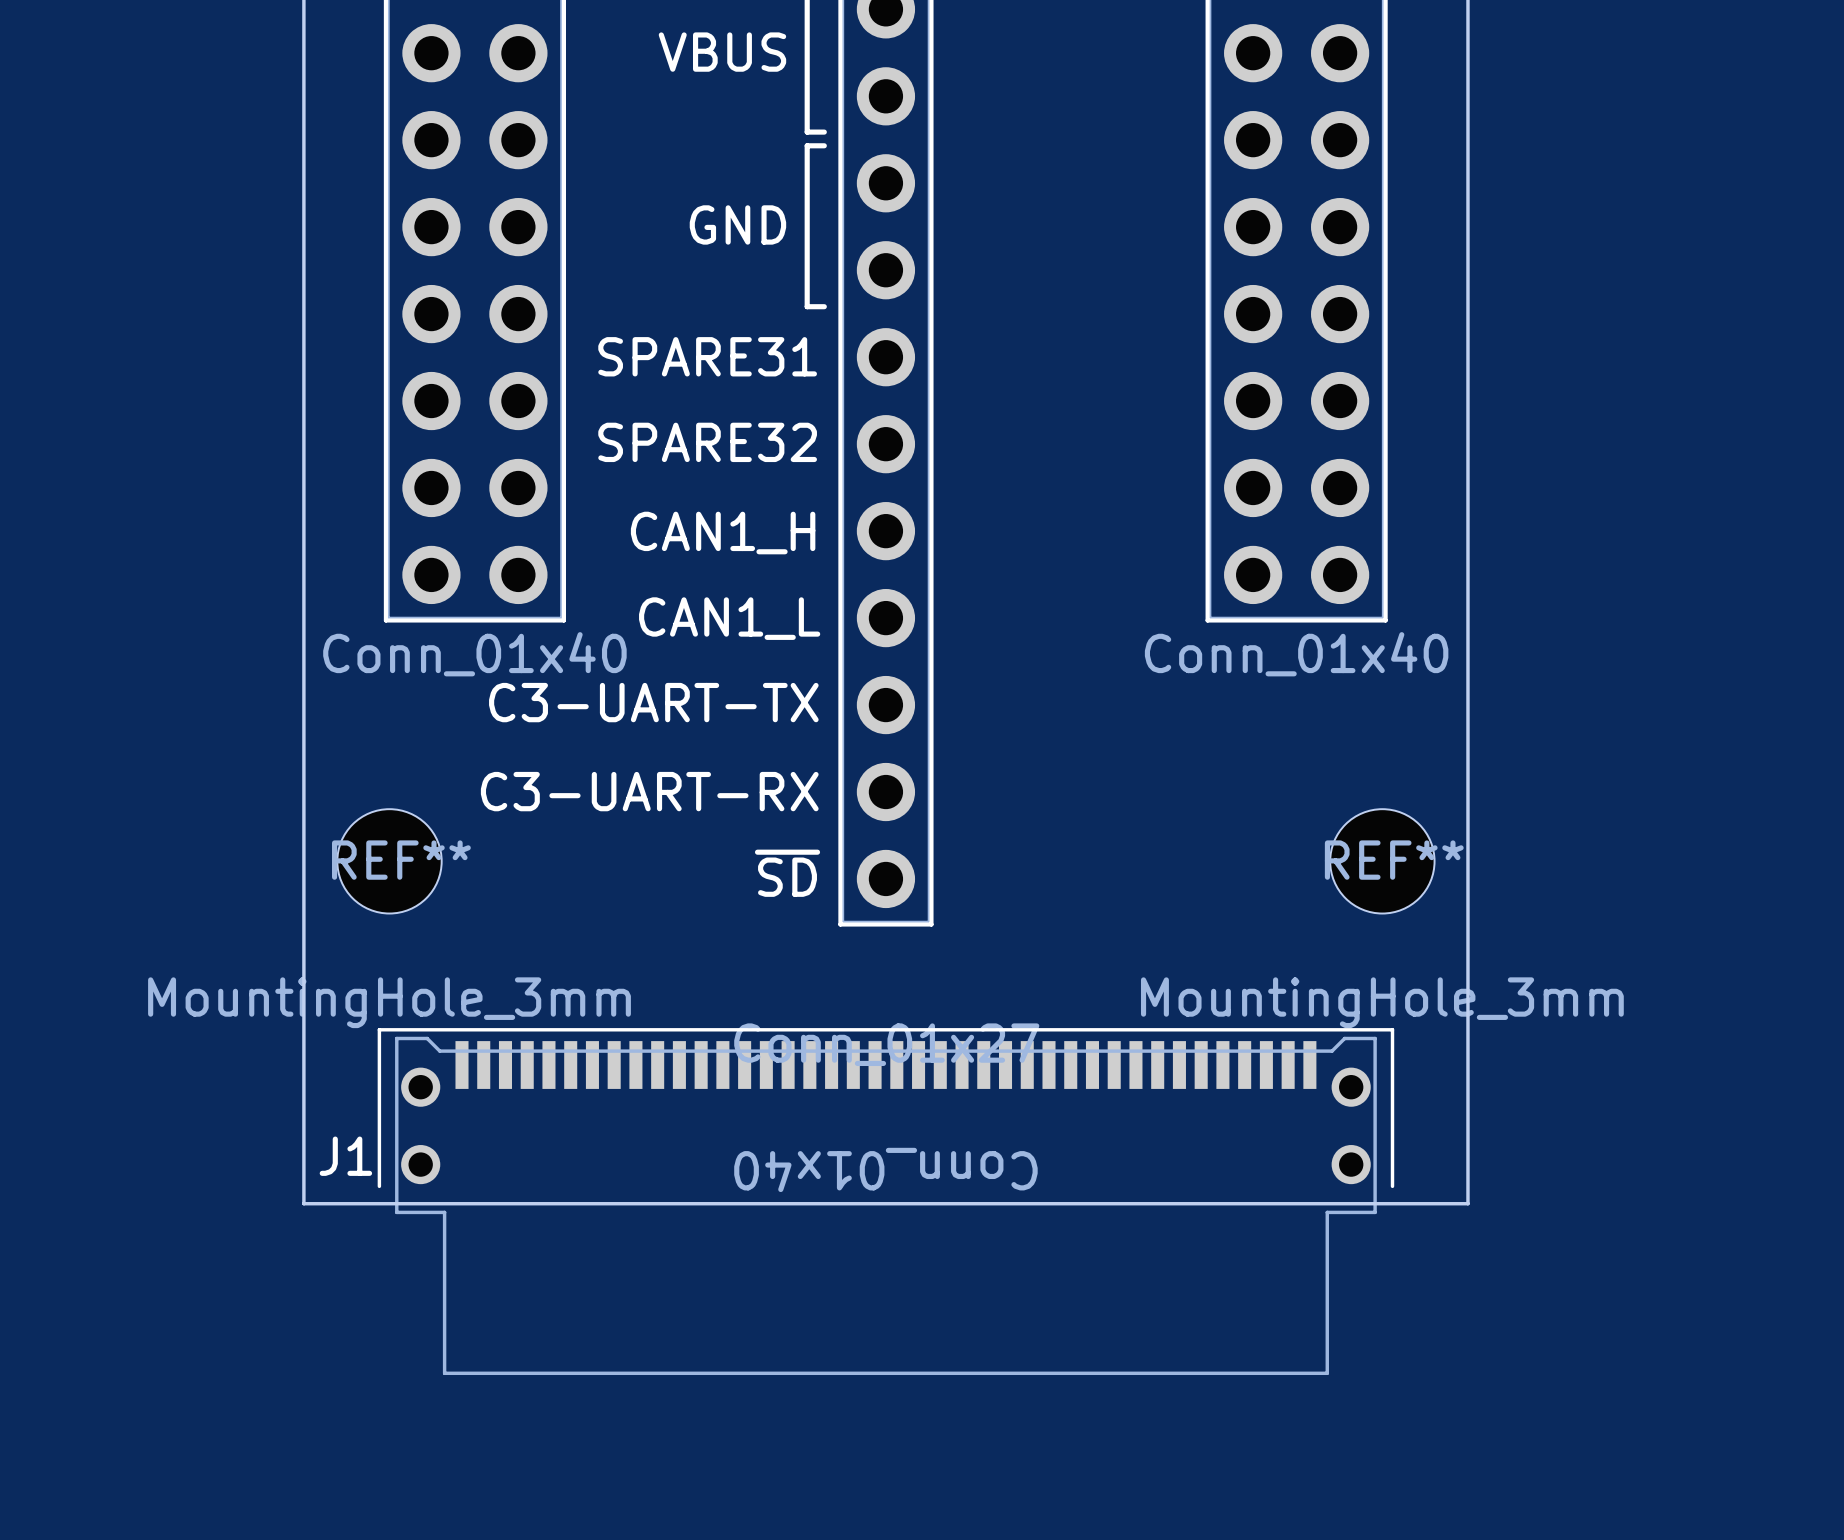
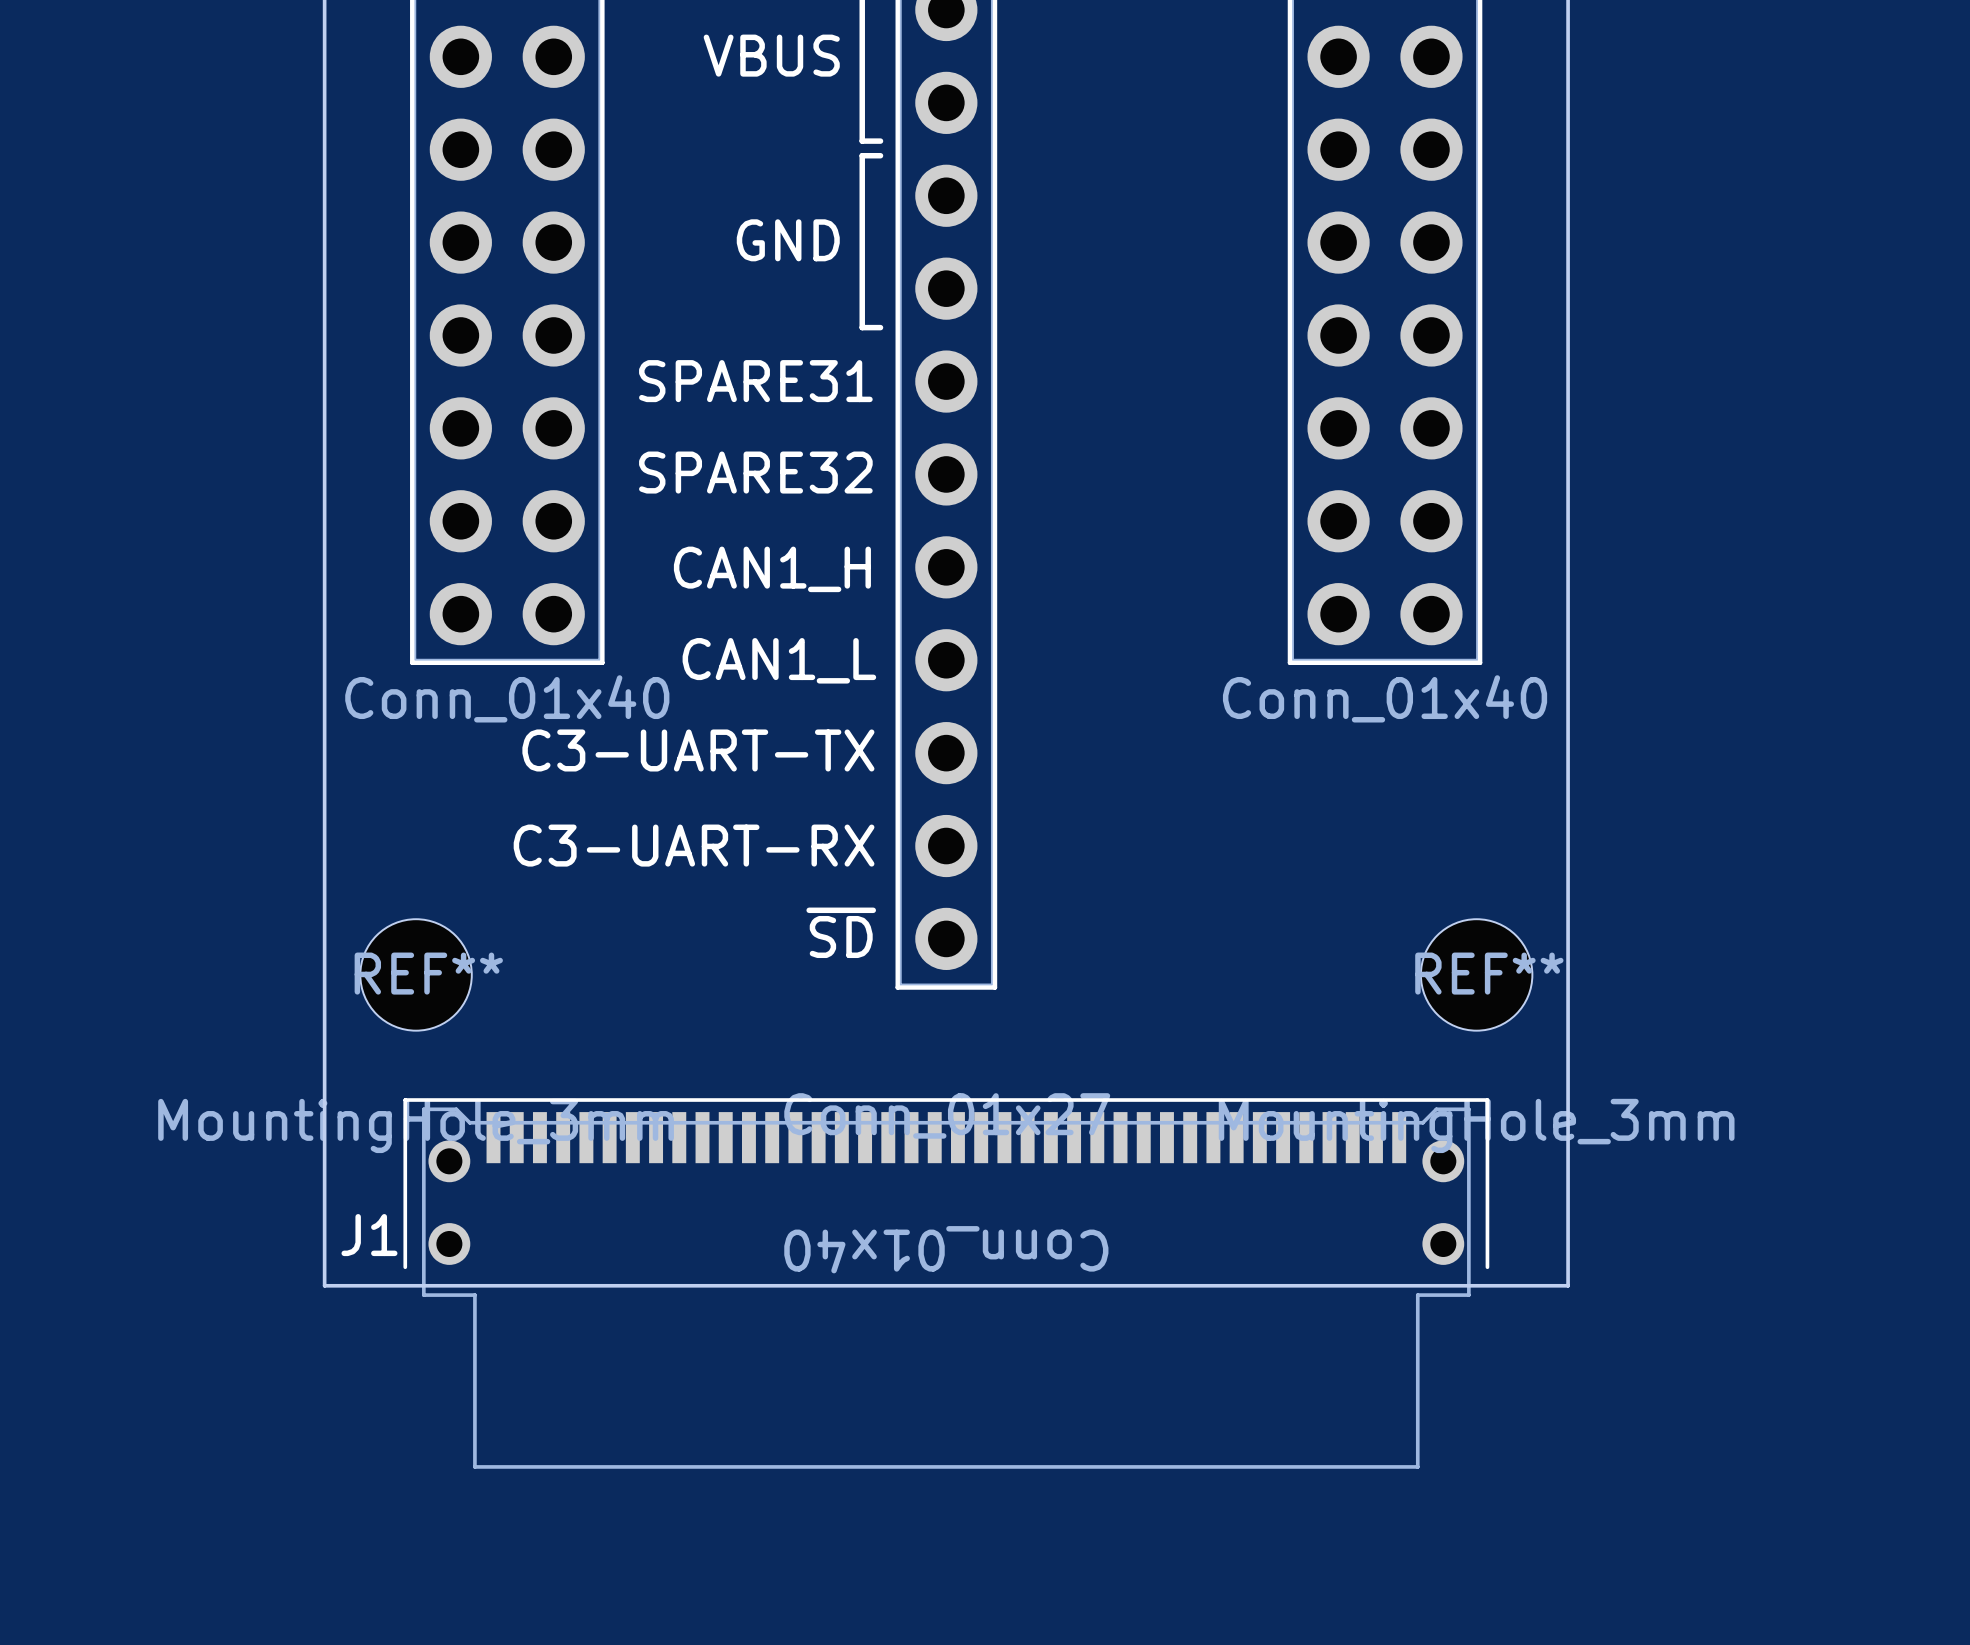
REF** position: (389, 861) -> (416, 974)
REF** position: (1382, 861) -> (1476, 974)

